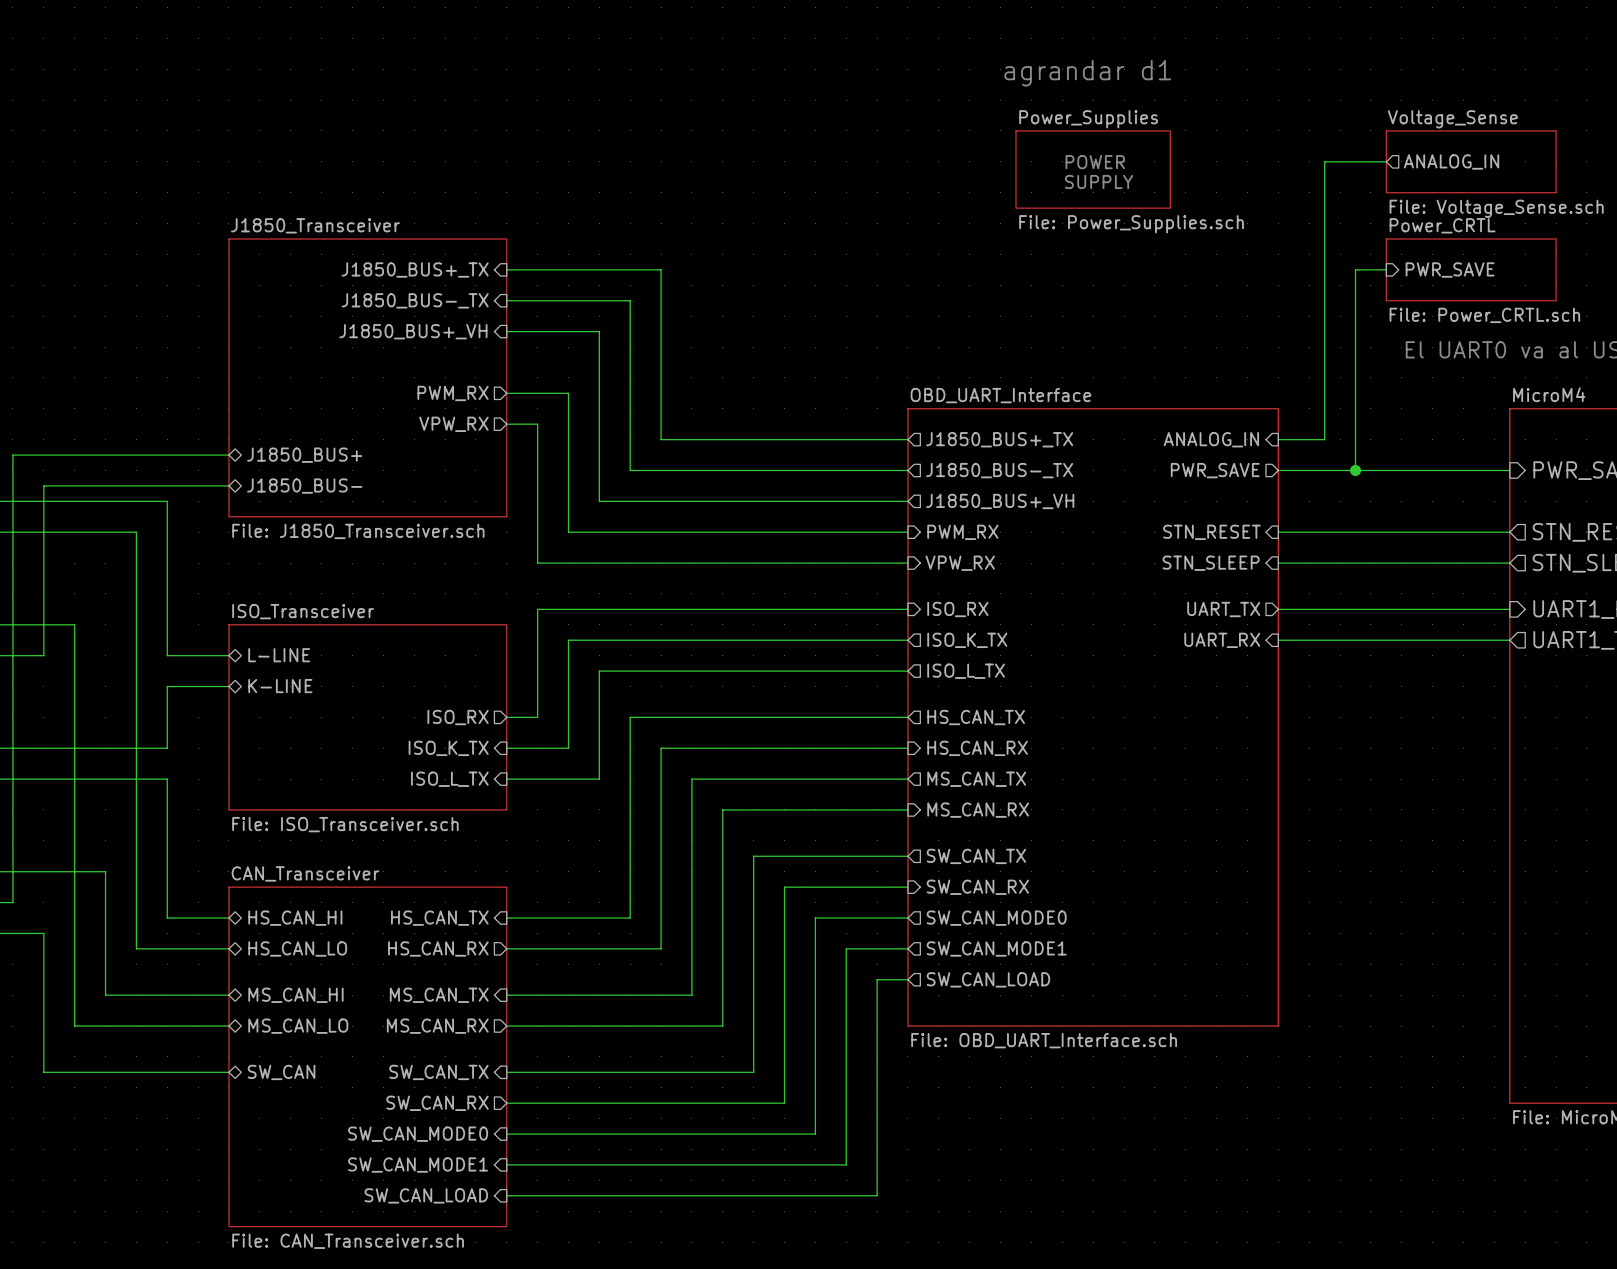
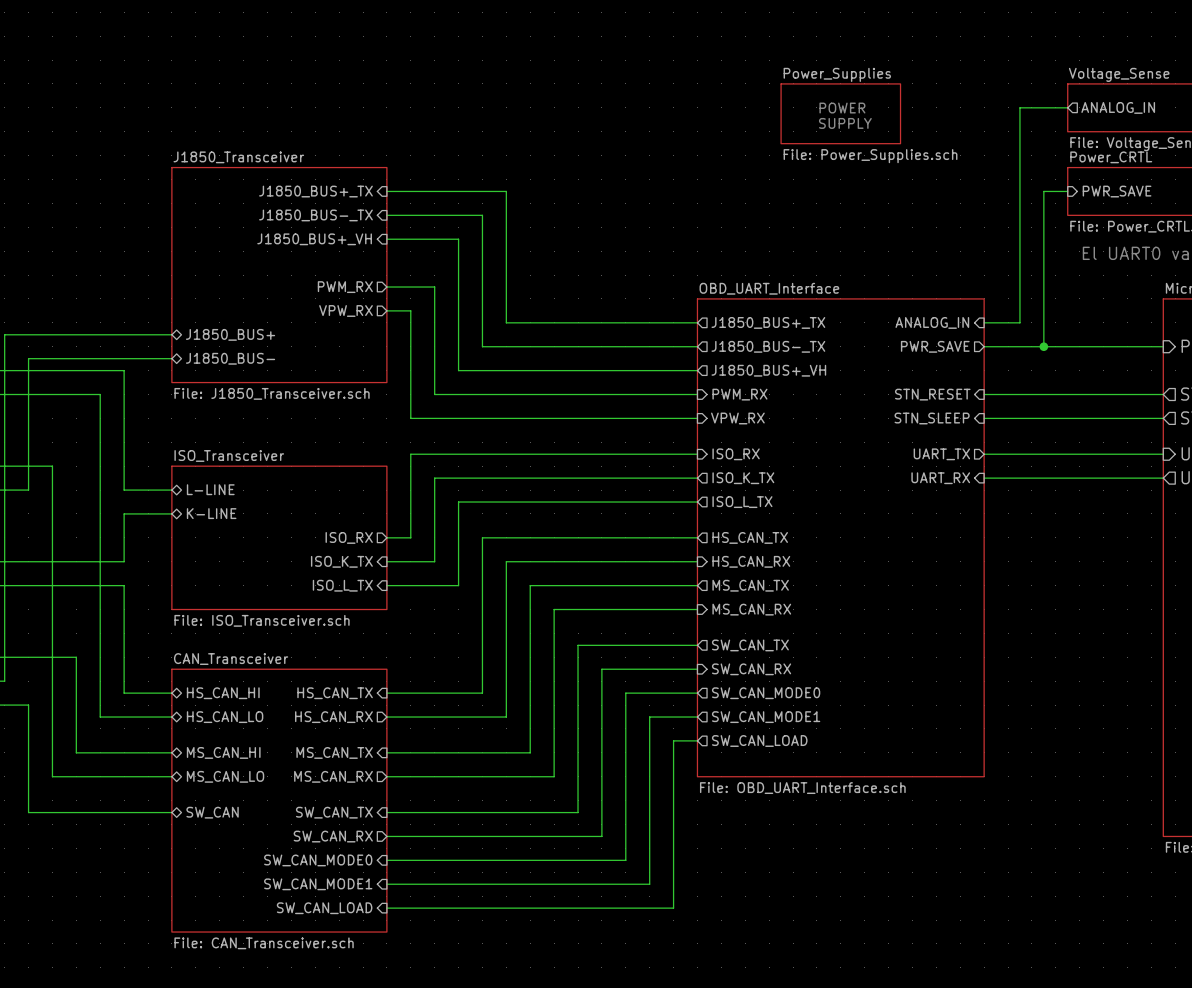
text: agrandar d1 (1087, 73) -> none

